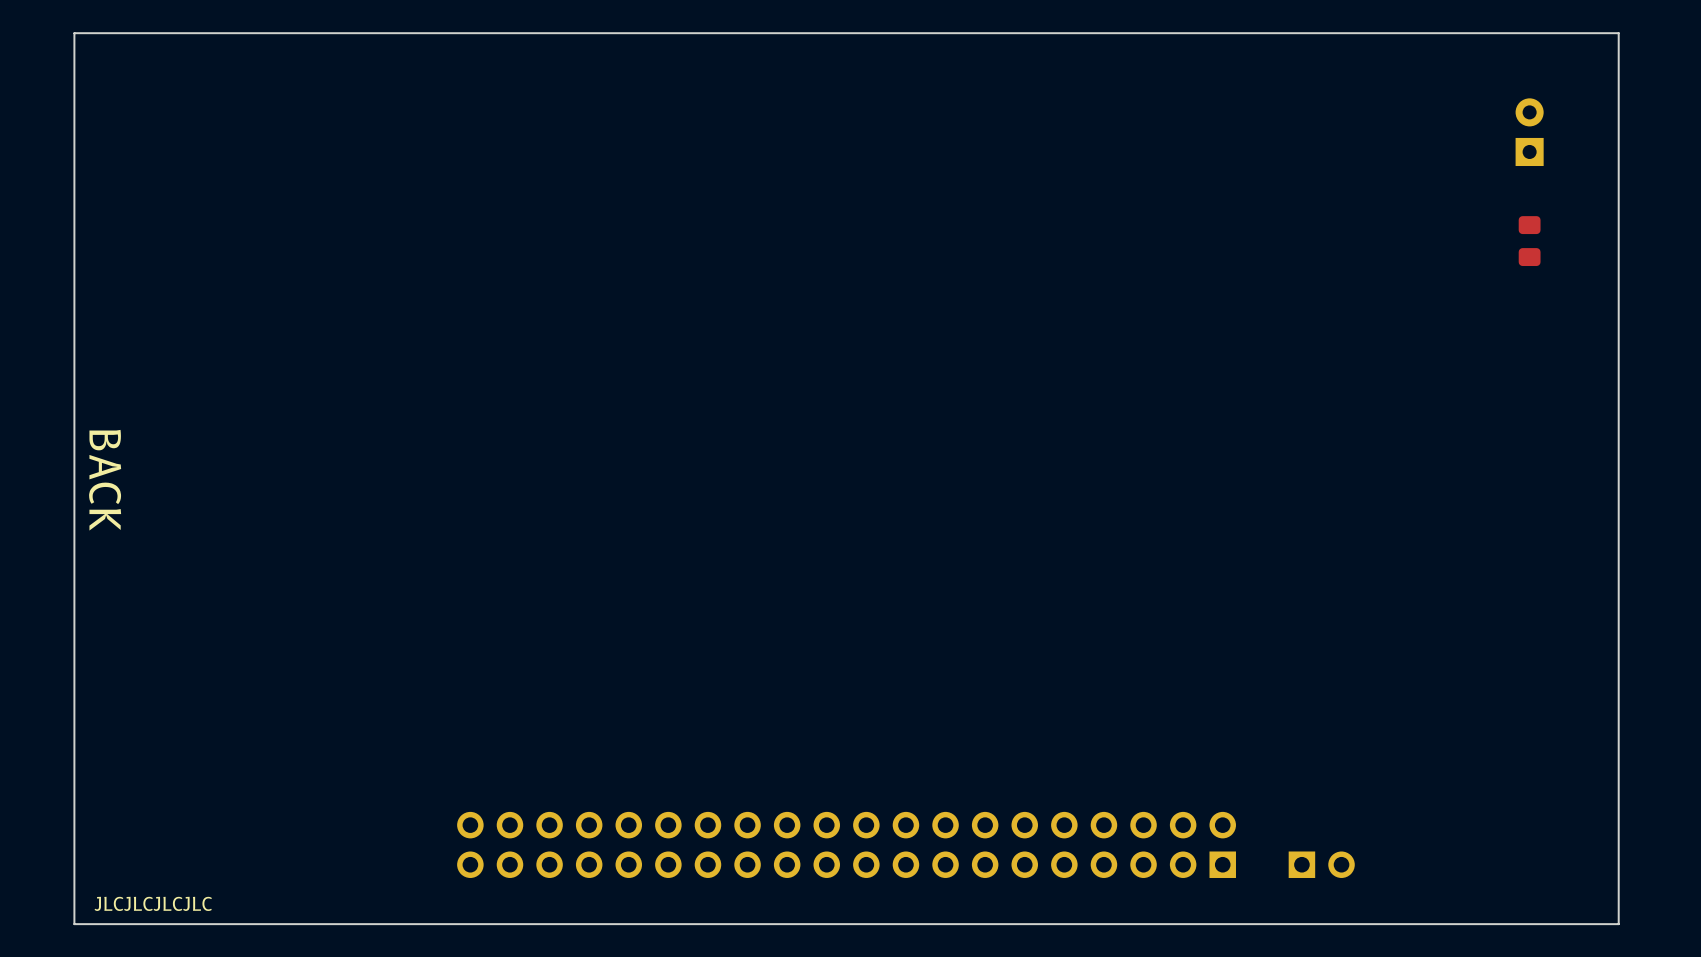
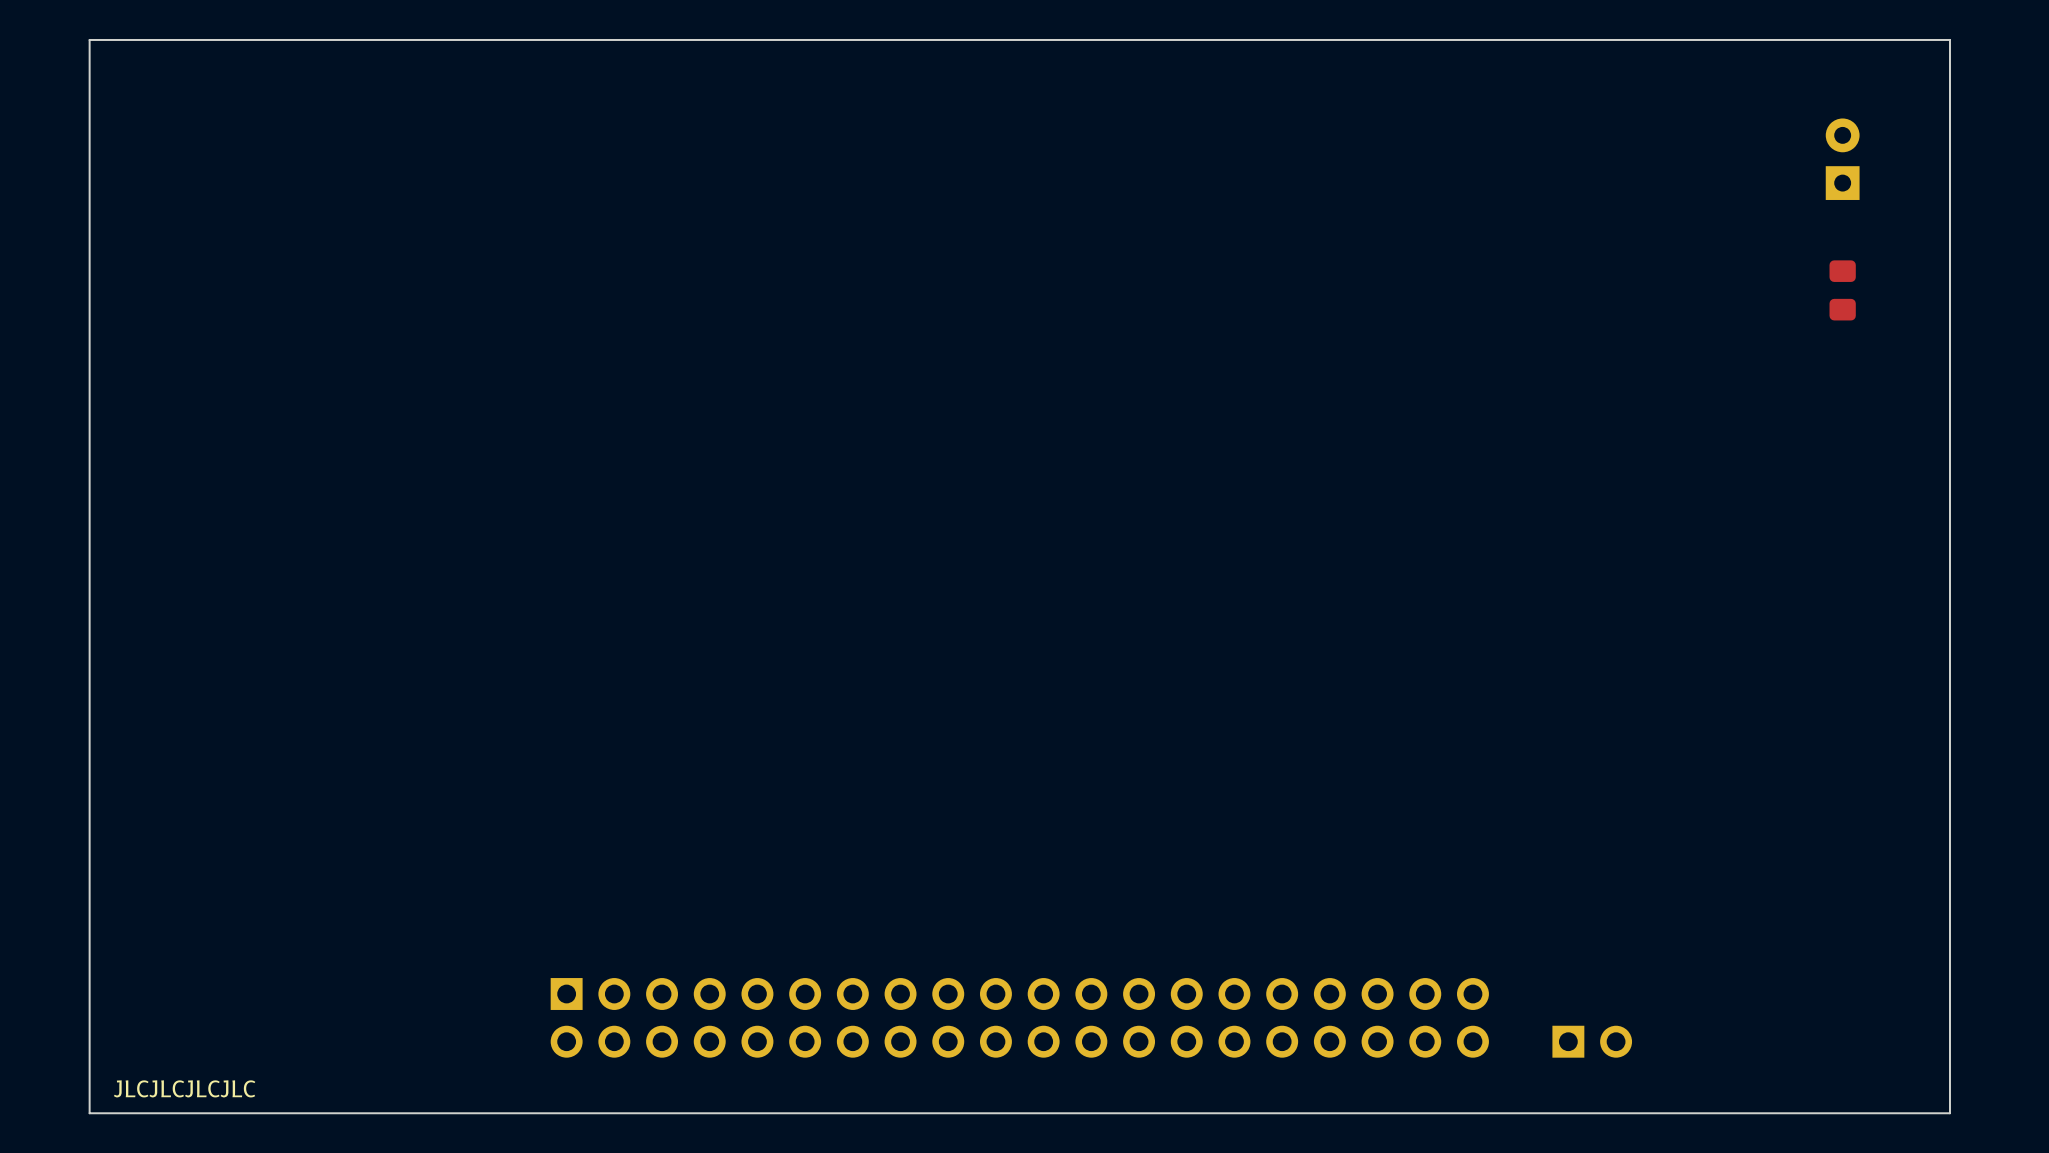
text: BACK (105, 480) -> none
part rotation: 0° (846, 844) -> 180° (1019, 1017)

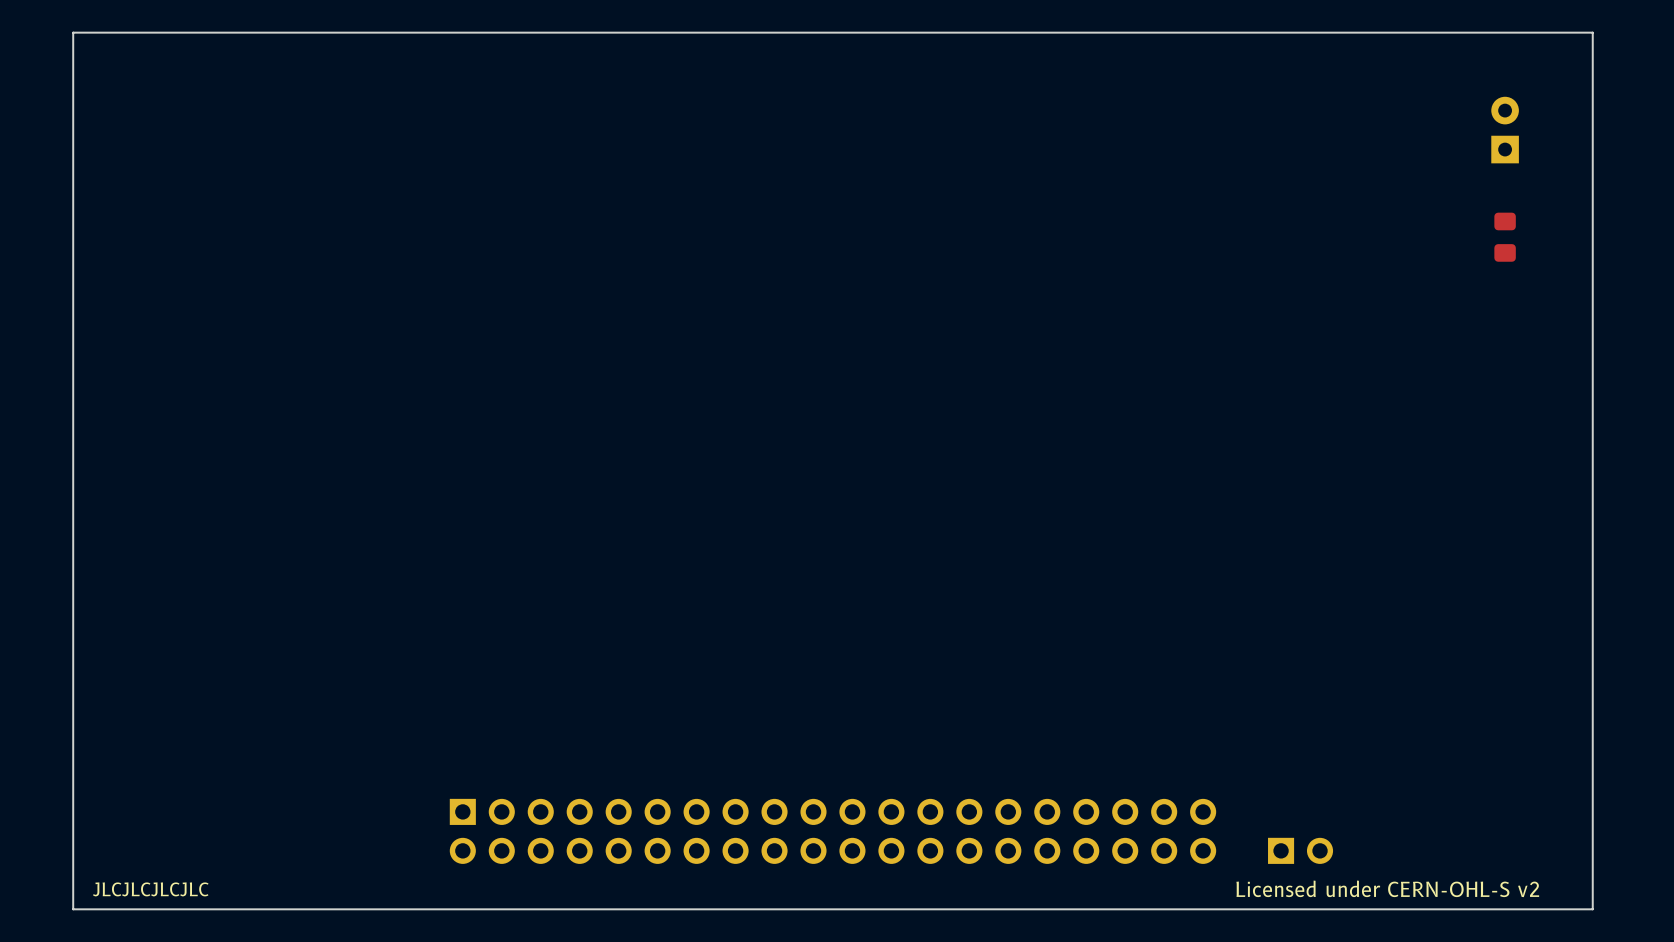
text: none -> Licensed under CERN-OHL-S v2 (1387, 888)

